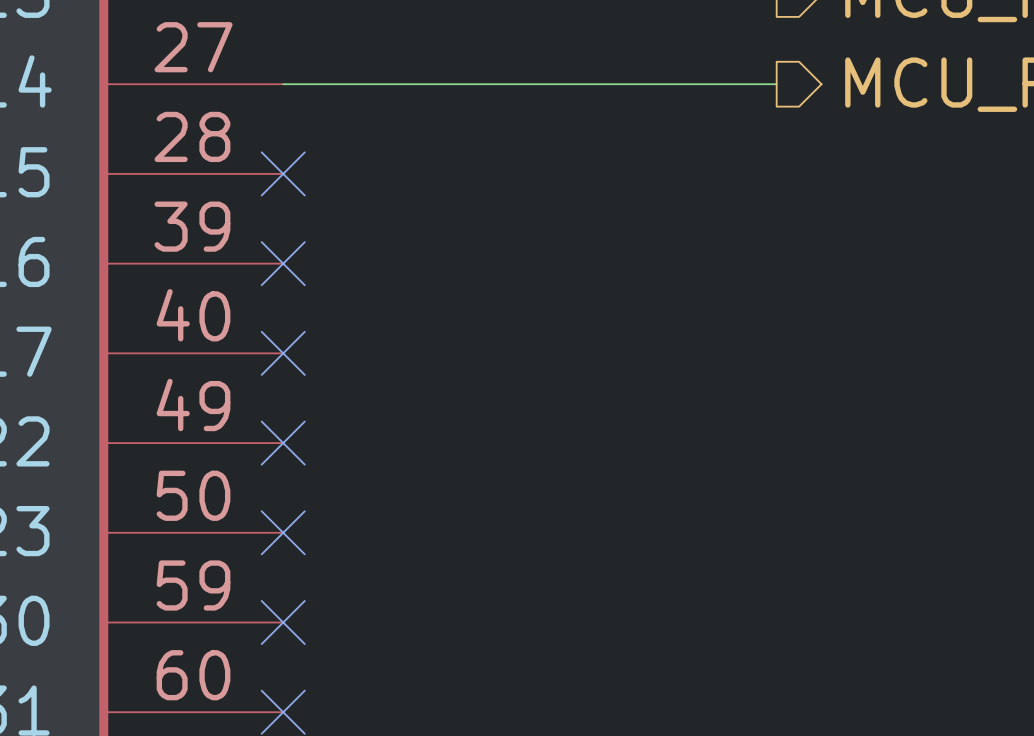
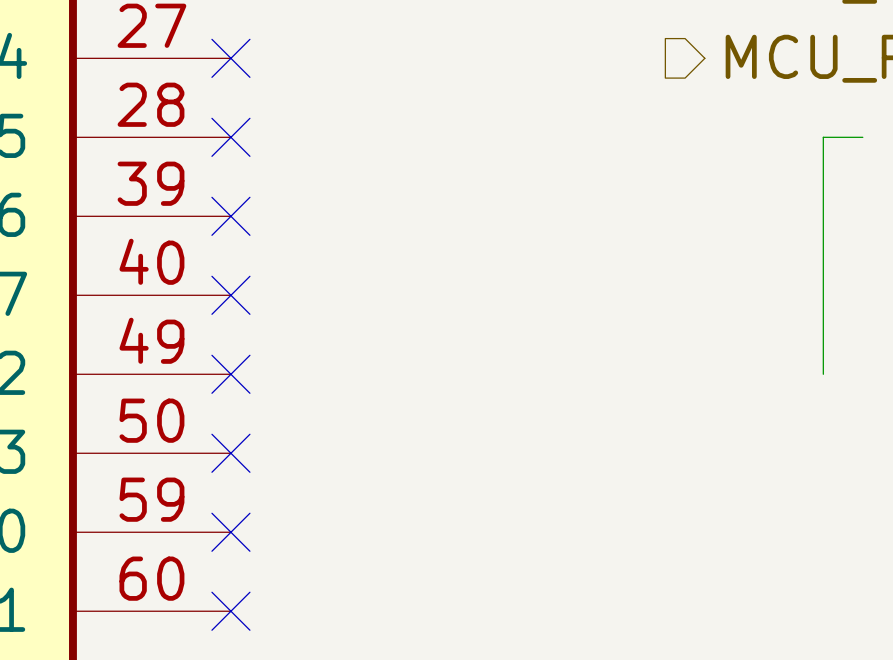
wire: (283, 84) (776, 84) -> none
no-connect mark: none -> (230, 58)
wire: none -> (862, 137) (823, 137) (823, 374)

